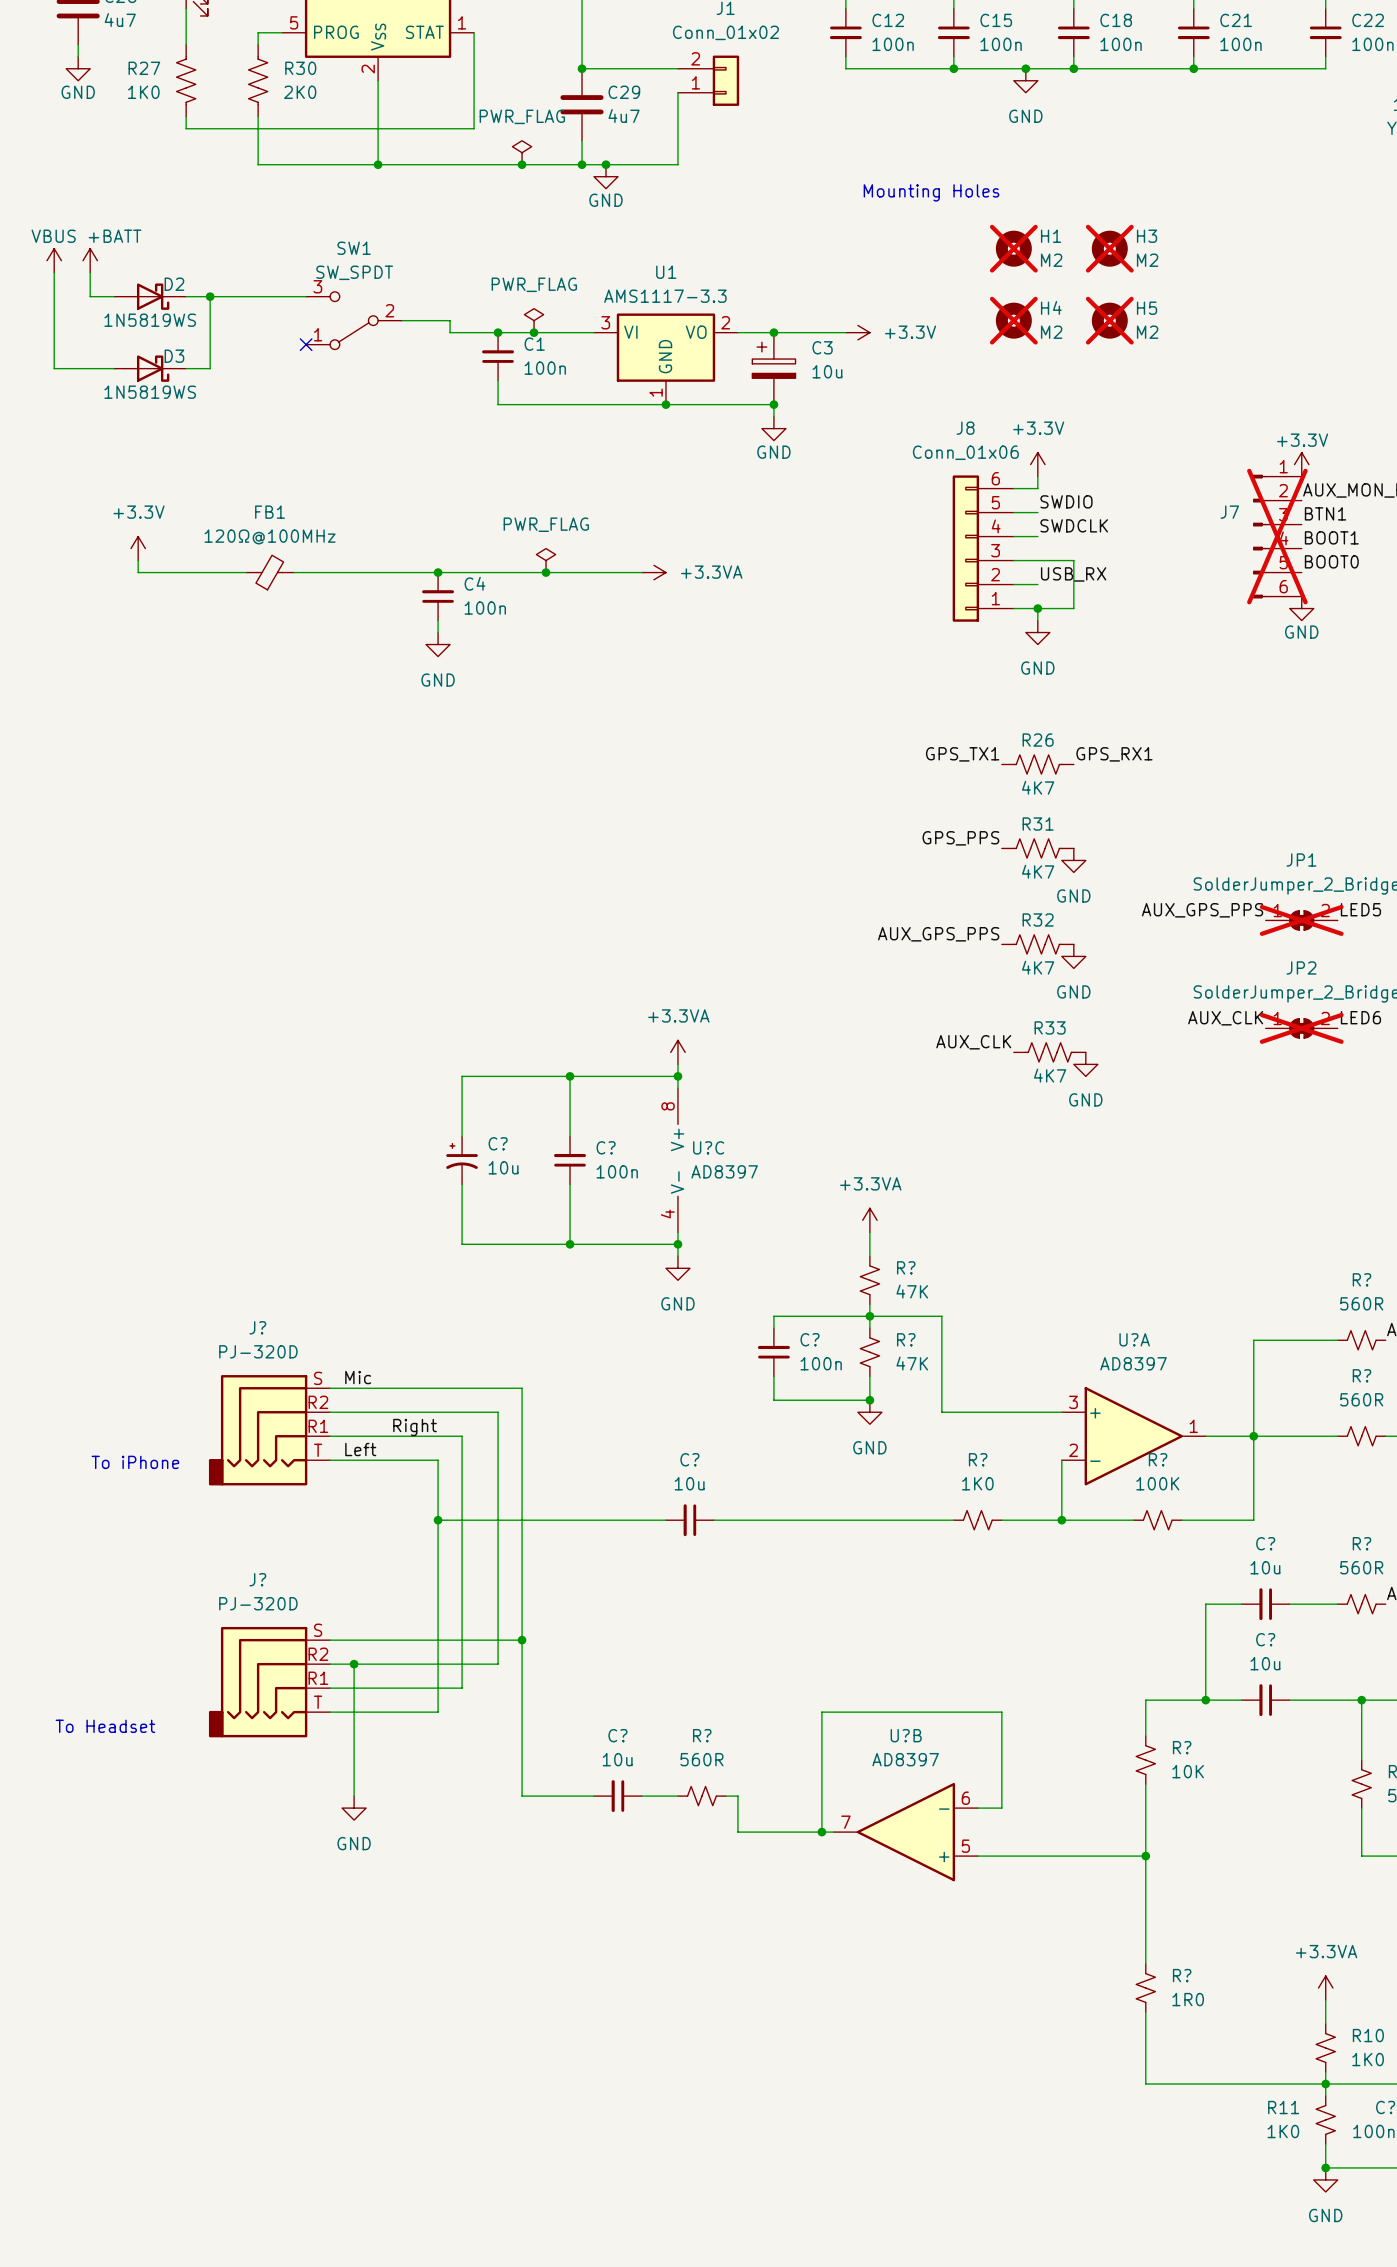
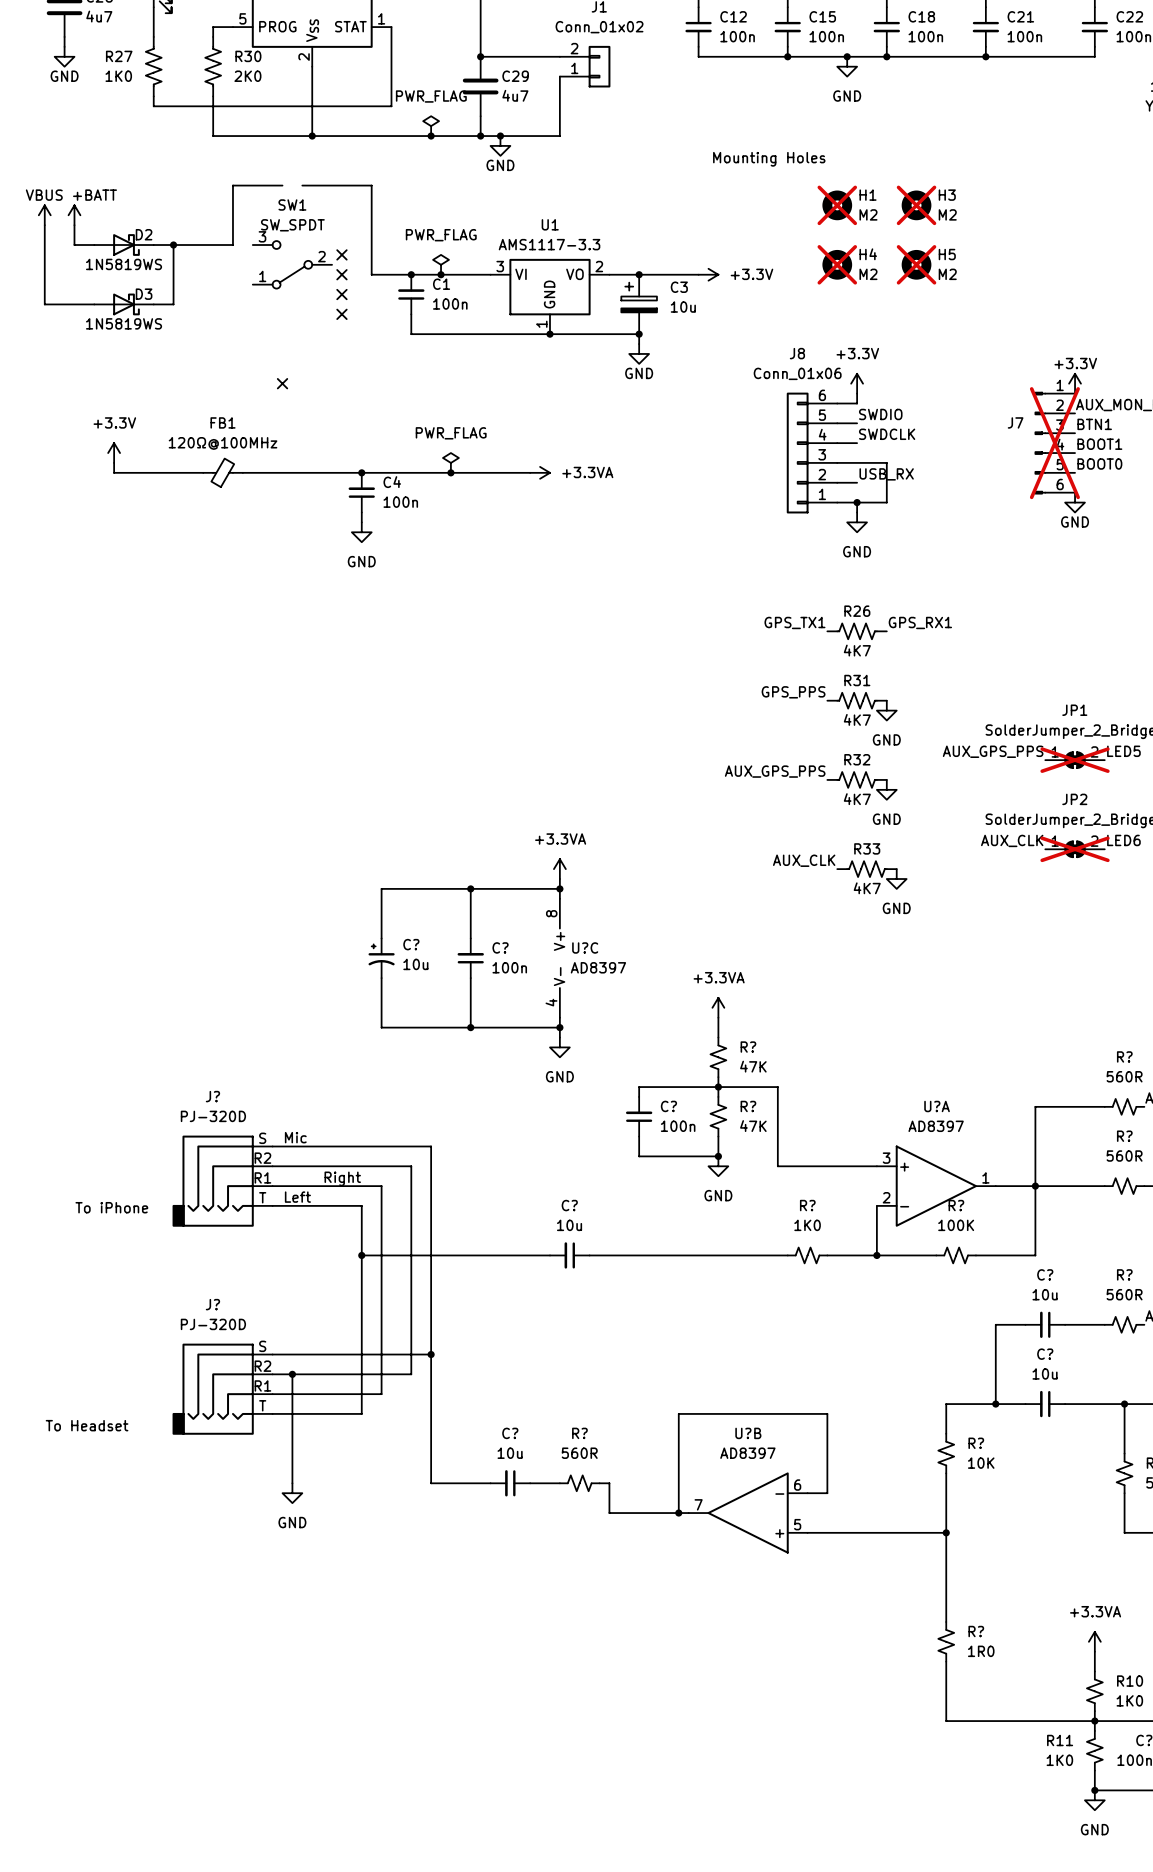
wire: (282, 296) (306, 296) -> (232, 245) (232, 185) (282, 185)
no-connect mark: none -> (341, 254)
wire: (402, 320) (450, 320) -> (302, 185) (371, 185) (371, 264)
no-connect mark: none -> (341, 274)
no-connect mark: (306, 344) -> none
no-connect mark: none -> (341, 294)
no-connect mark: none -> (341, 314)
no-connect mark: none -> (282, 383)

